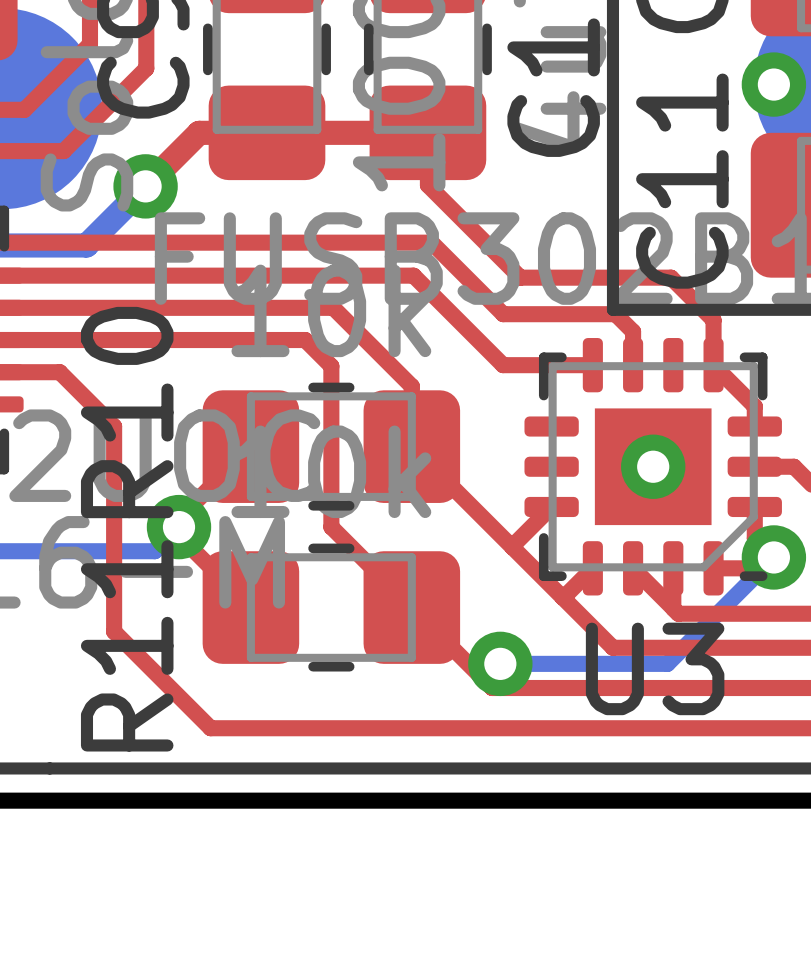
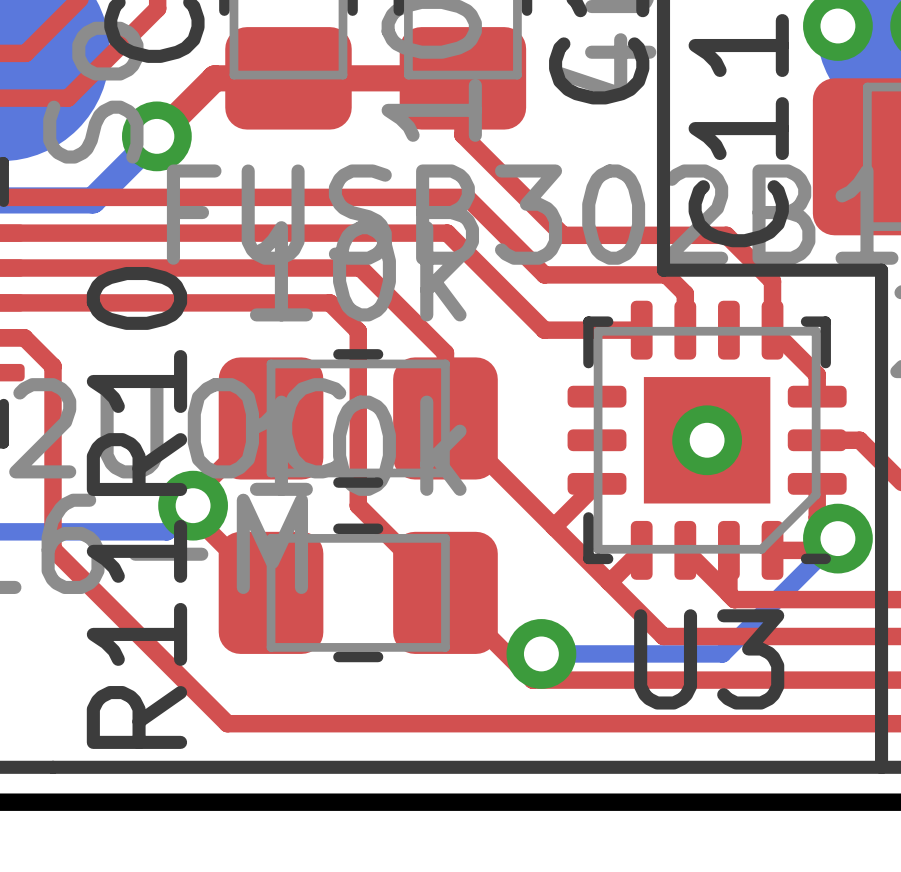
top track: (23, 372) (59, 372) (114, 426) (114, 631) -> (24, 337) (53, 366) (53, 549) (122, 619)

